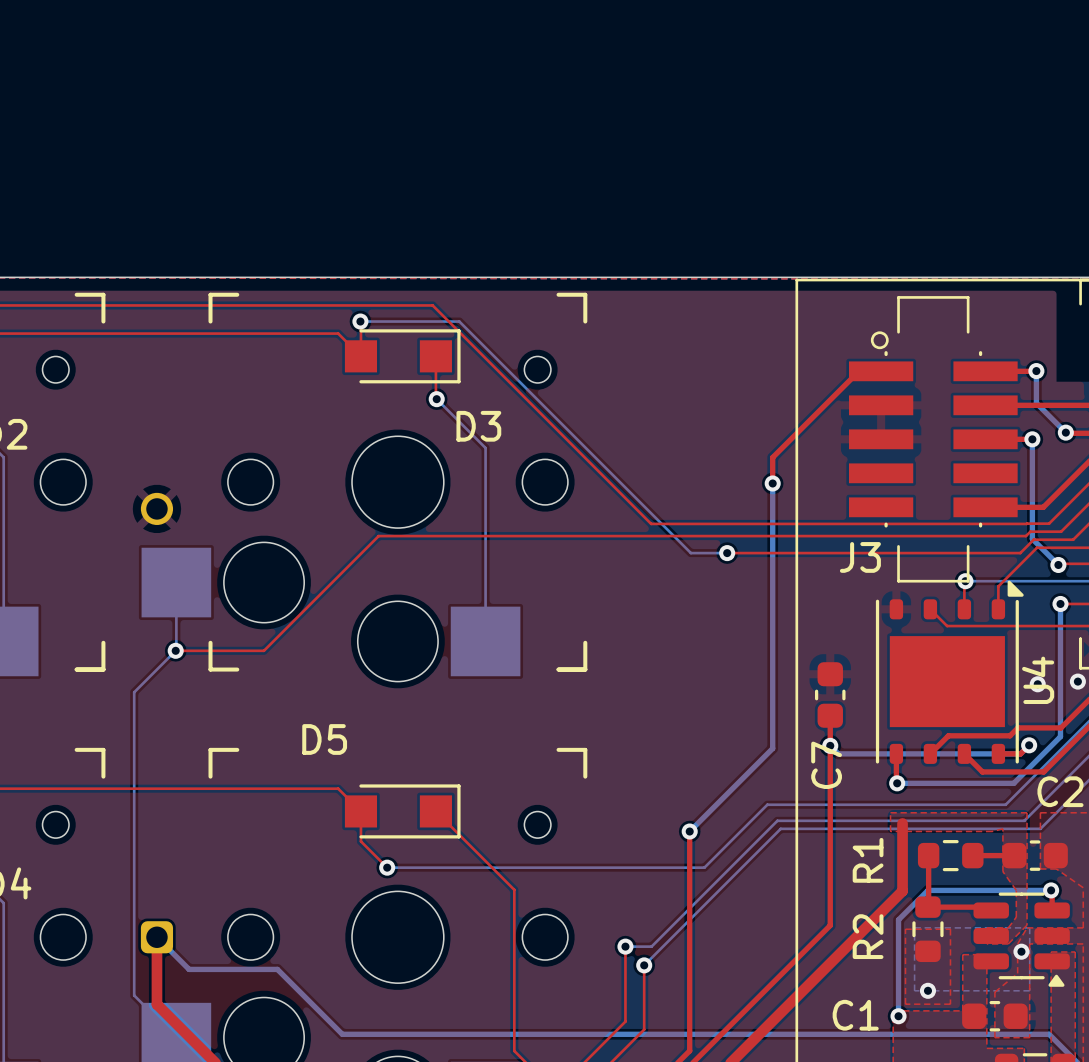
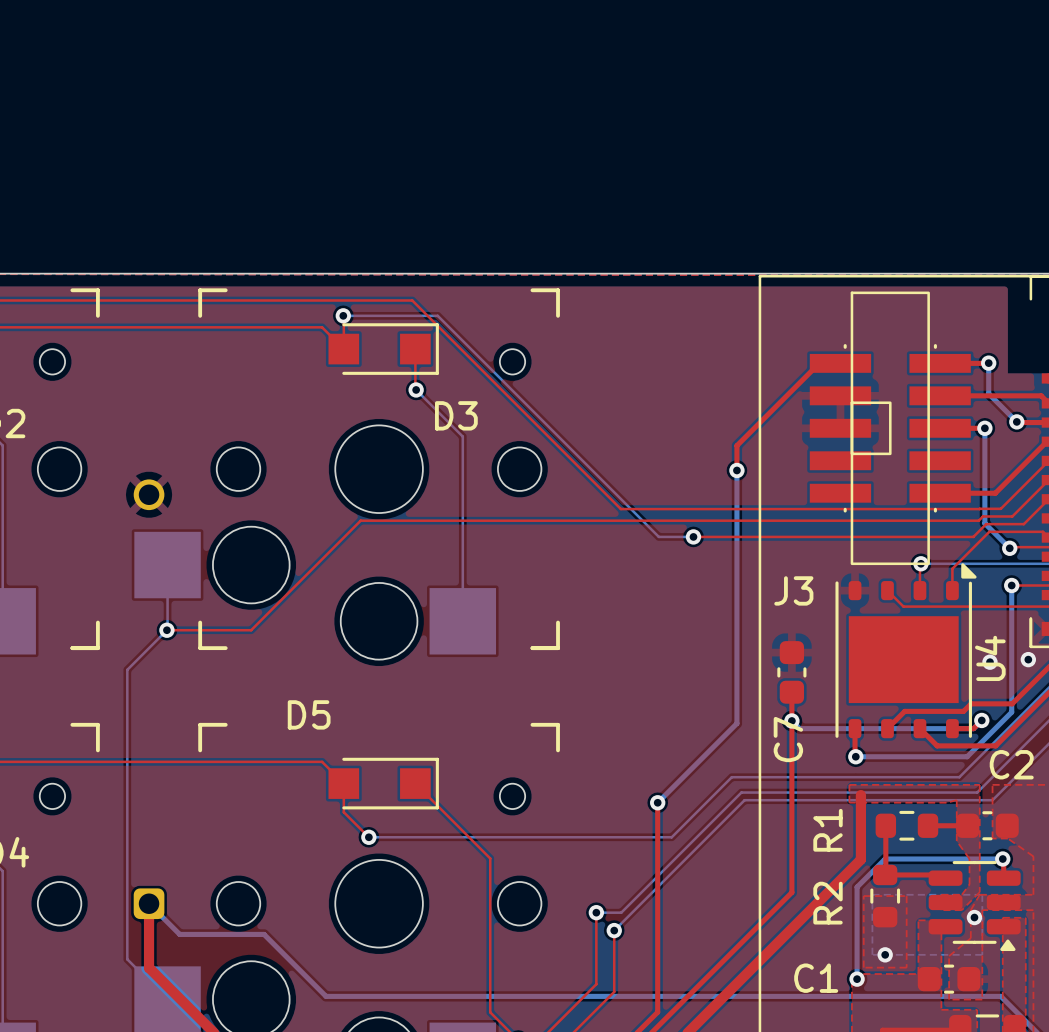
J3 footprint: [849, 296, 1018, 583] -> [809, 291, 971, 566]
J3 name position: J3 (860, 557) -> J3 (793, 590)

